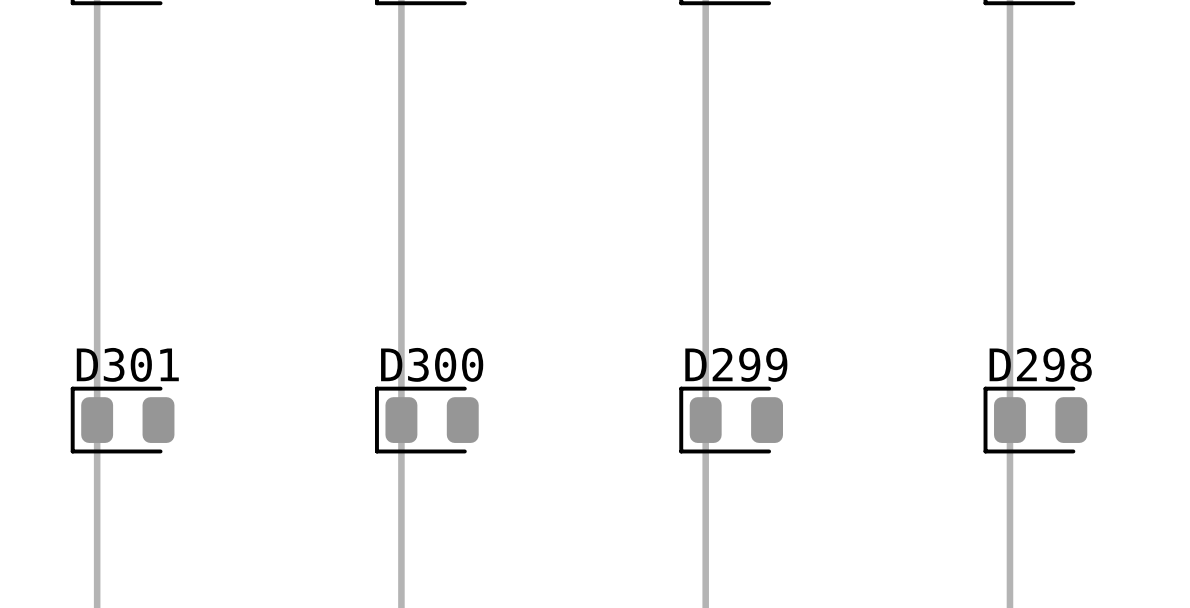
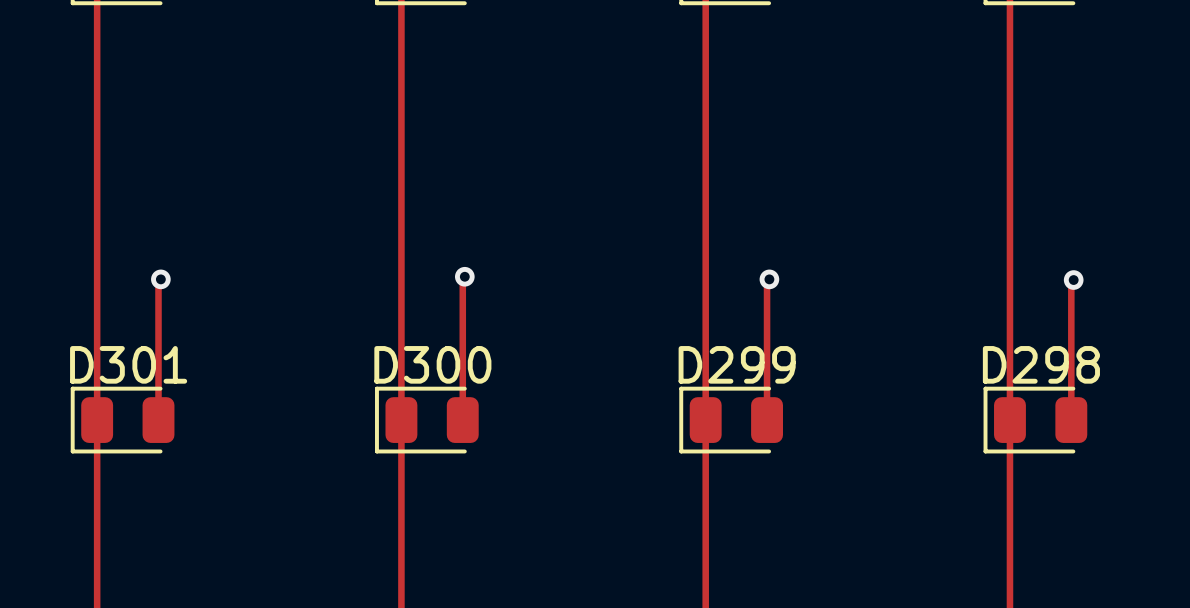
track: none -> (464, 276) (462, 278) (462, 420)
via: none -> (464, 276)
track: none -> (160, 279) (158, 281) (158, 420)
via: none -> (160, 279)
track: none -> (769, 279) (767, 281) (767, 420)
via: none -> (769, 279)
track: none -> (1073, 280) (1071, 282) (1071, 420)
via: none -> (1073, 280)

